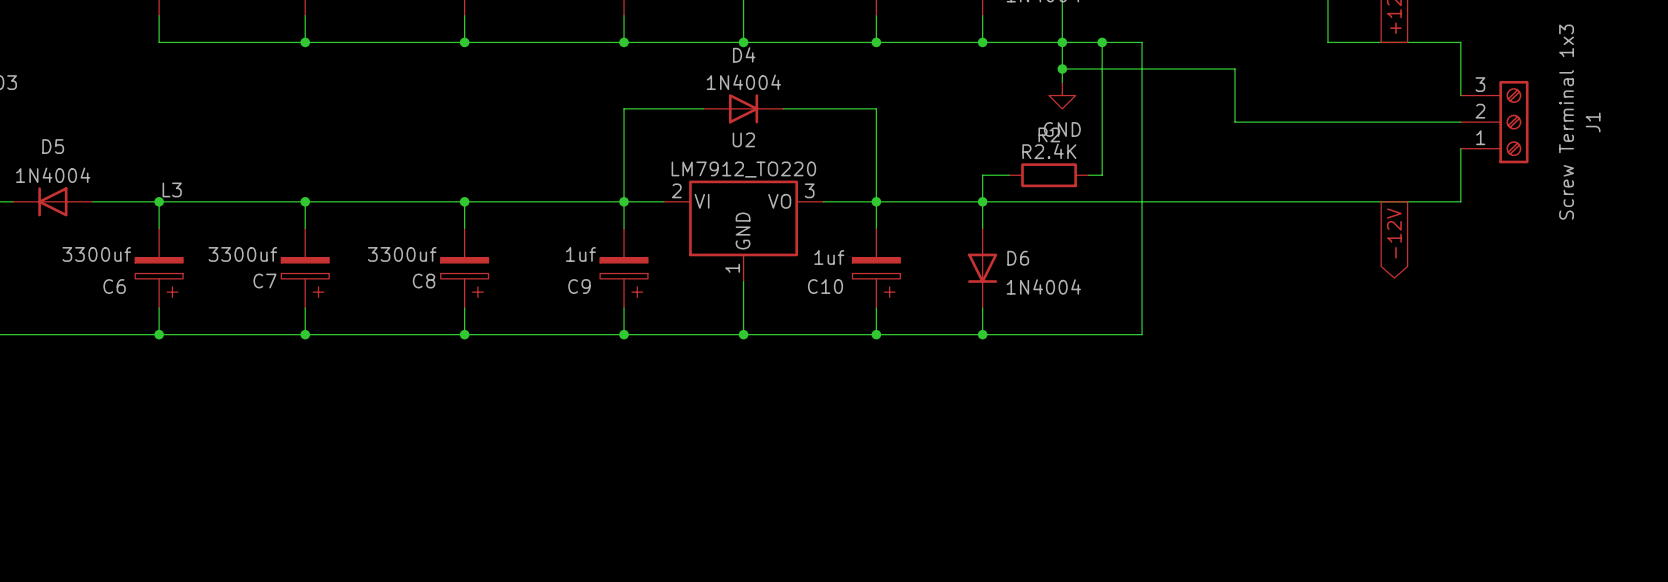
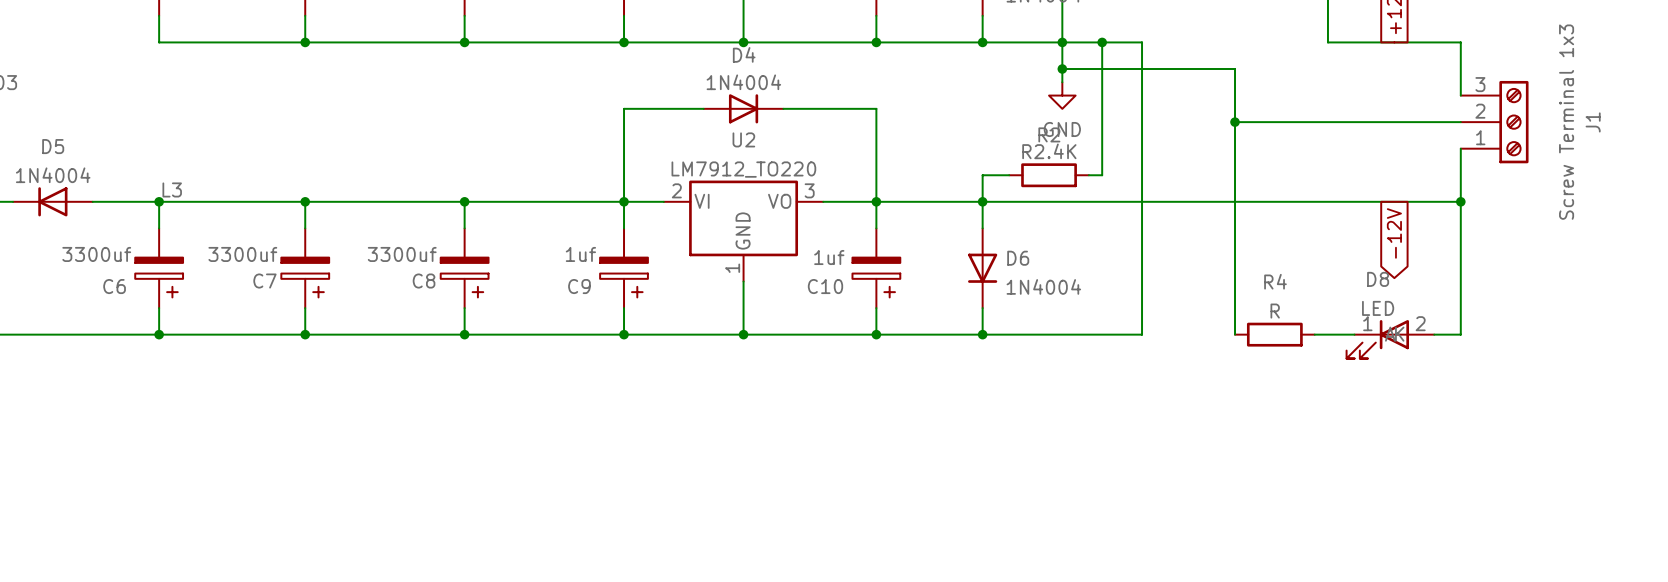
wire: none -> (1235, 122) (1235, 334)
junction: none -> (1235, 122)
wire: none -> (1460, 201) (1460, 334) (1434, 334)
junction: none -> (1460, 201)
R4: none -> R (1274, 334)
wire: none -> (1314, 334) (1354, 334)
D8: none -> LED (1390, 339)

